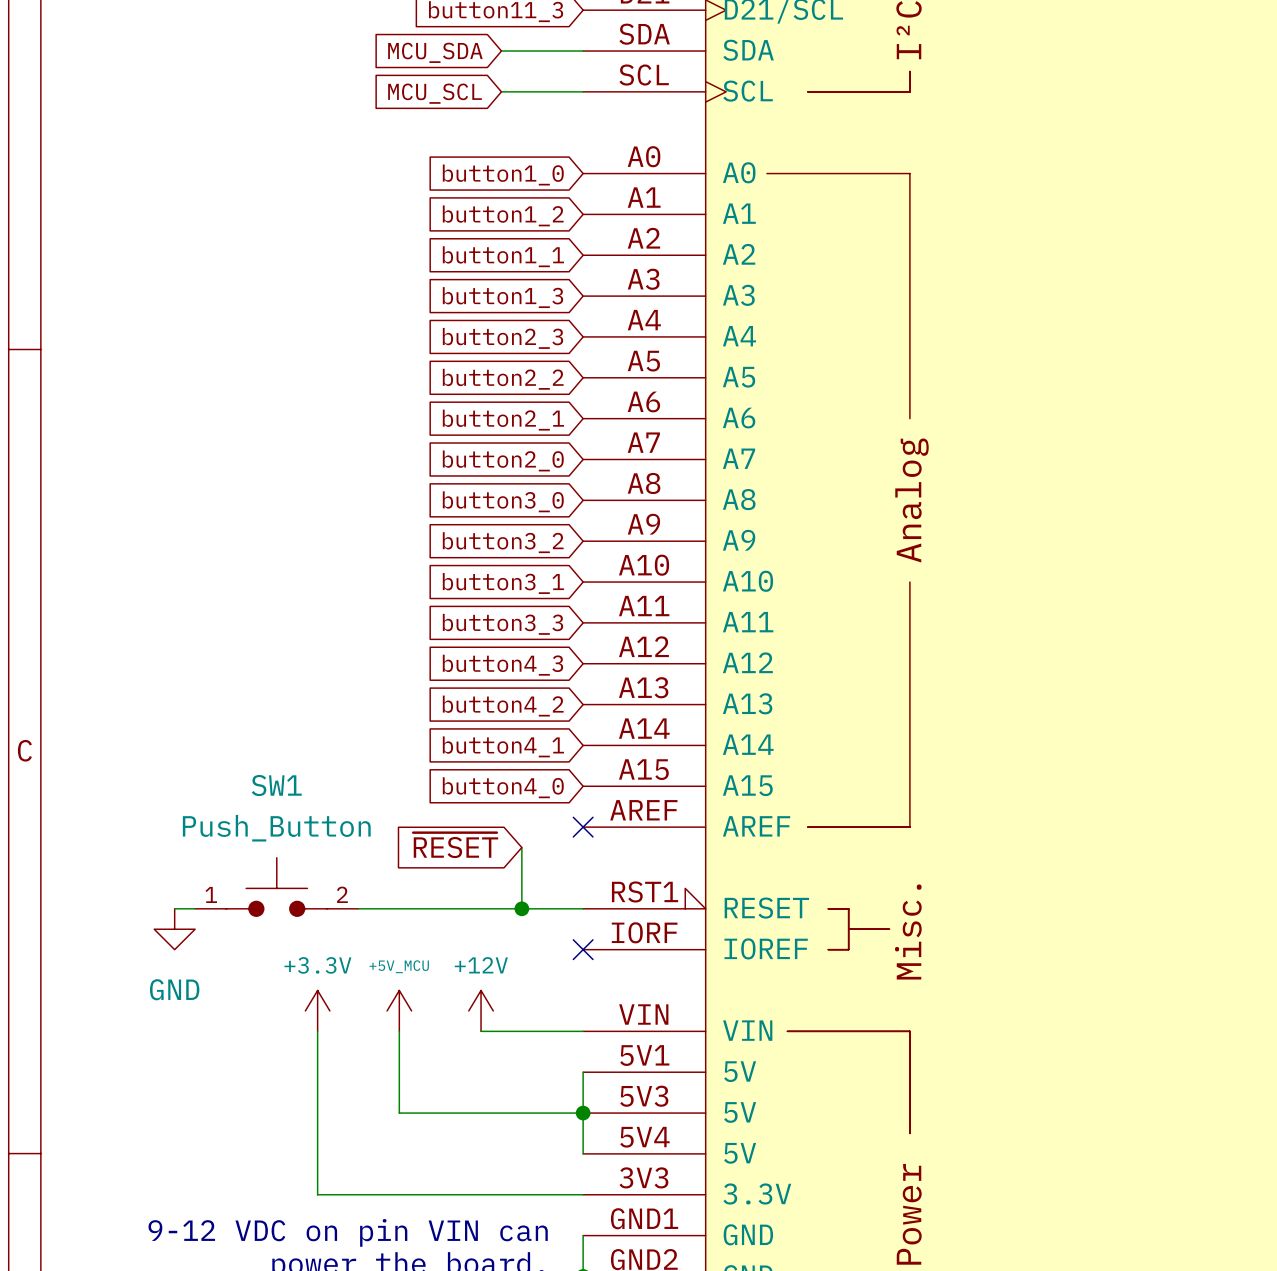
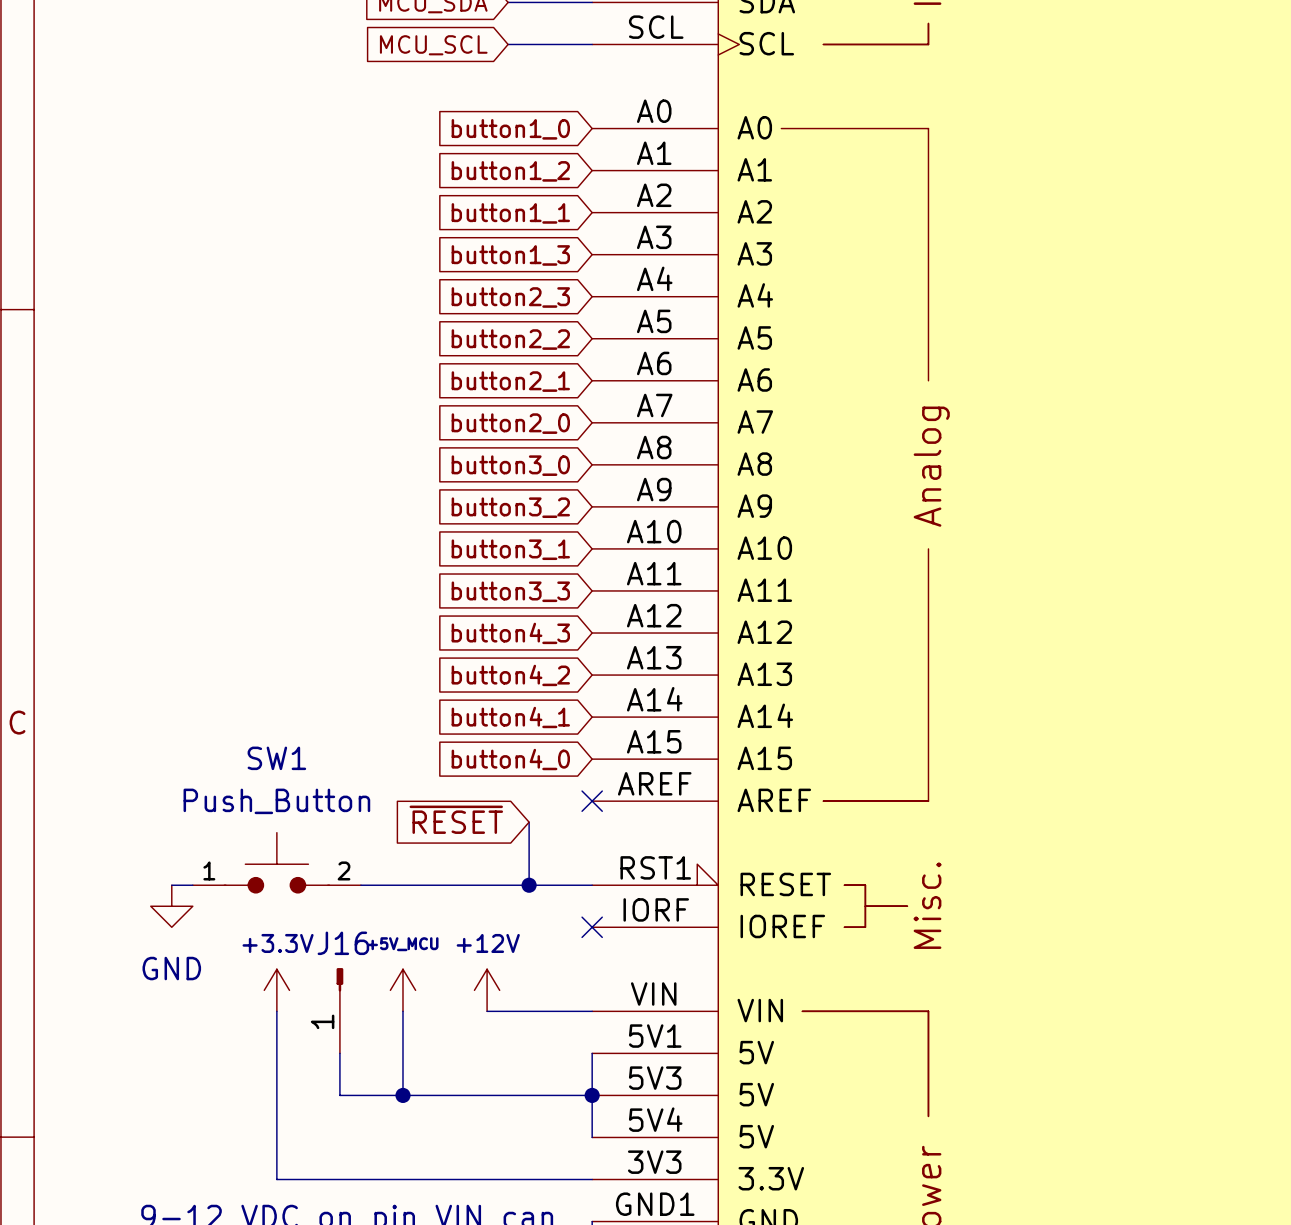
power symbol position: +3.3V (317, 1010) -> +3.3V (276, 990)
J16: none -> (339, 1010)
wire: (317, 1031) (317, 1194) -> (276, 1011) (276, 1179) (318, 1179)
wire: none -> (339, 1053) (339, 1095) (402, 1095)
junction: none -> (402, 1095)

